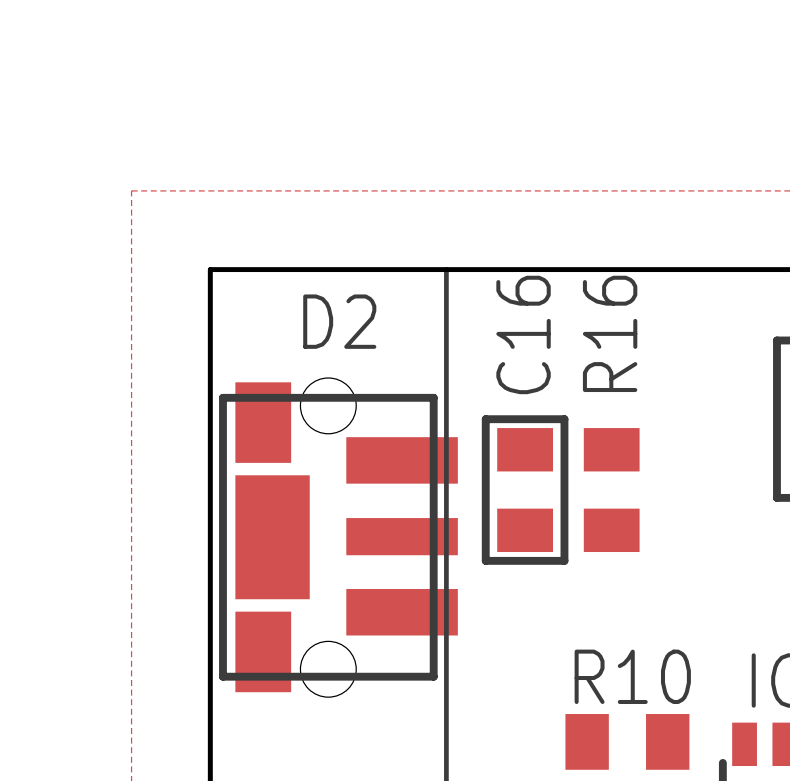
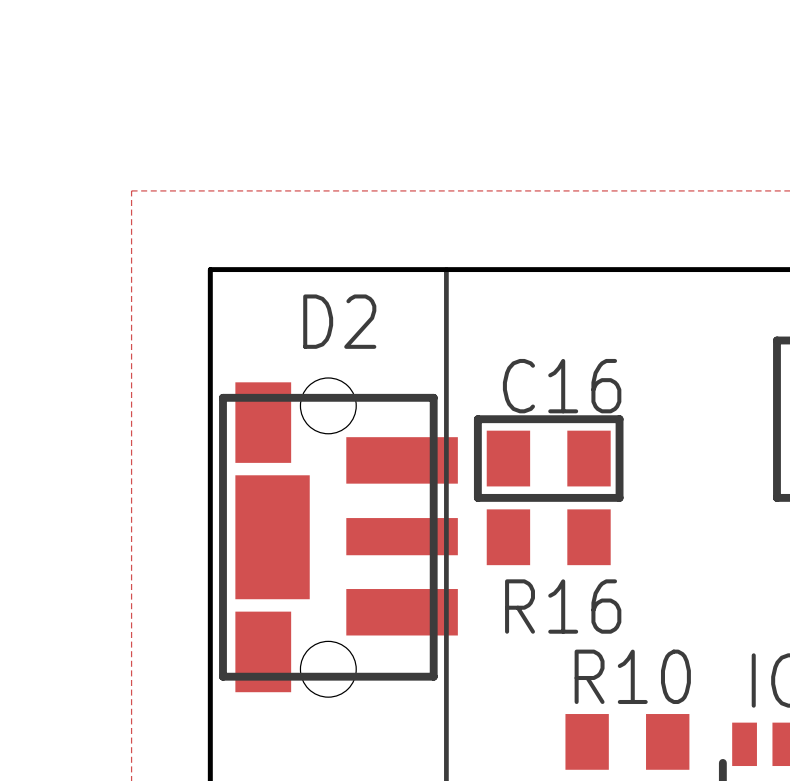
R16 name position: R16 (610, 333) -> R16 (563, 606)
C16 rotation: 0° (525, 490) -> 90° clockwise (548, 458)
R16 rotation: 0° (611, 490) -> 90° clockwise (548, 537)
R16 position: (611, 490) -> (548, 537)

